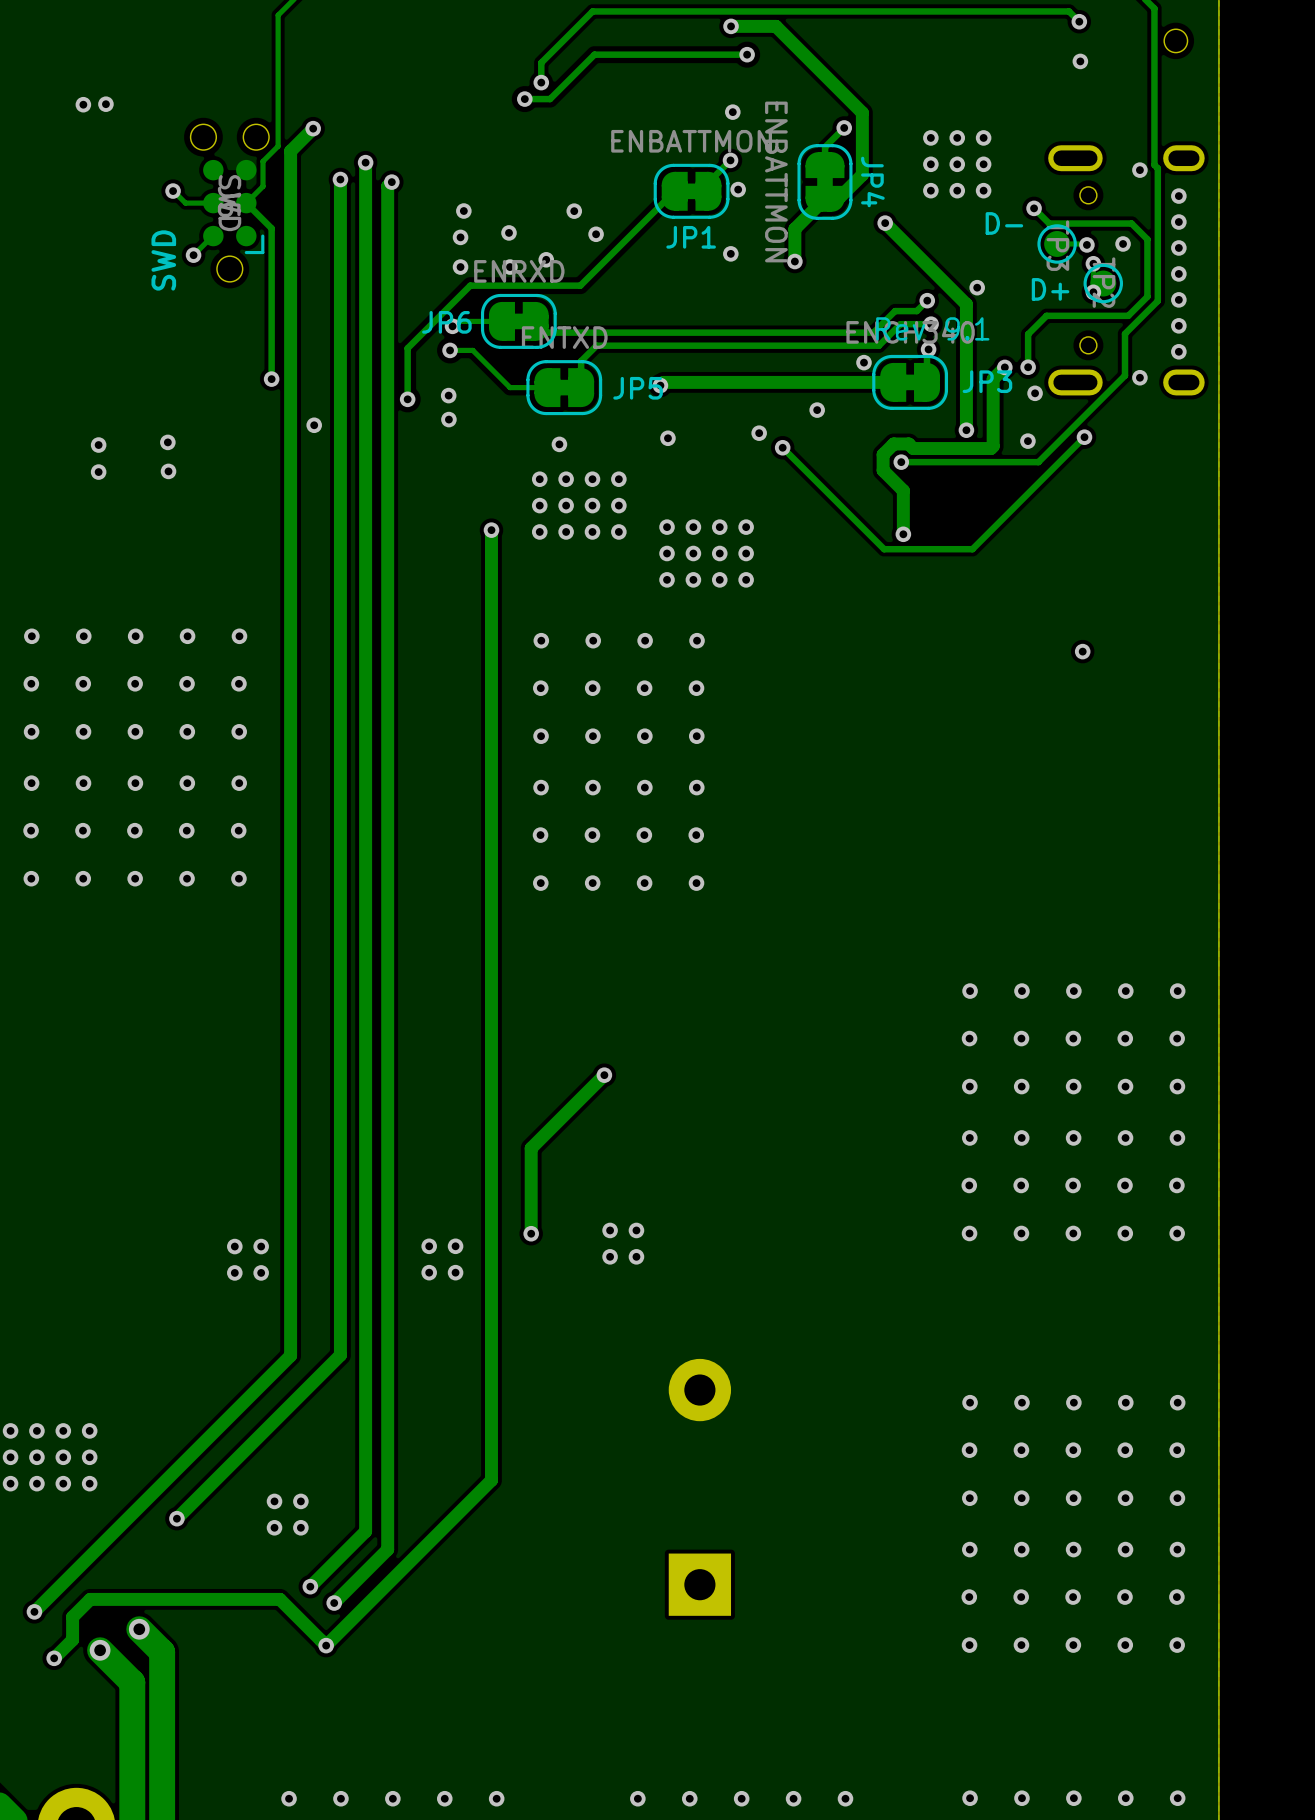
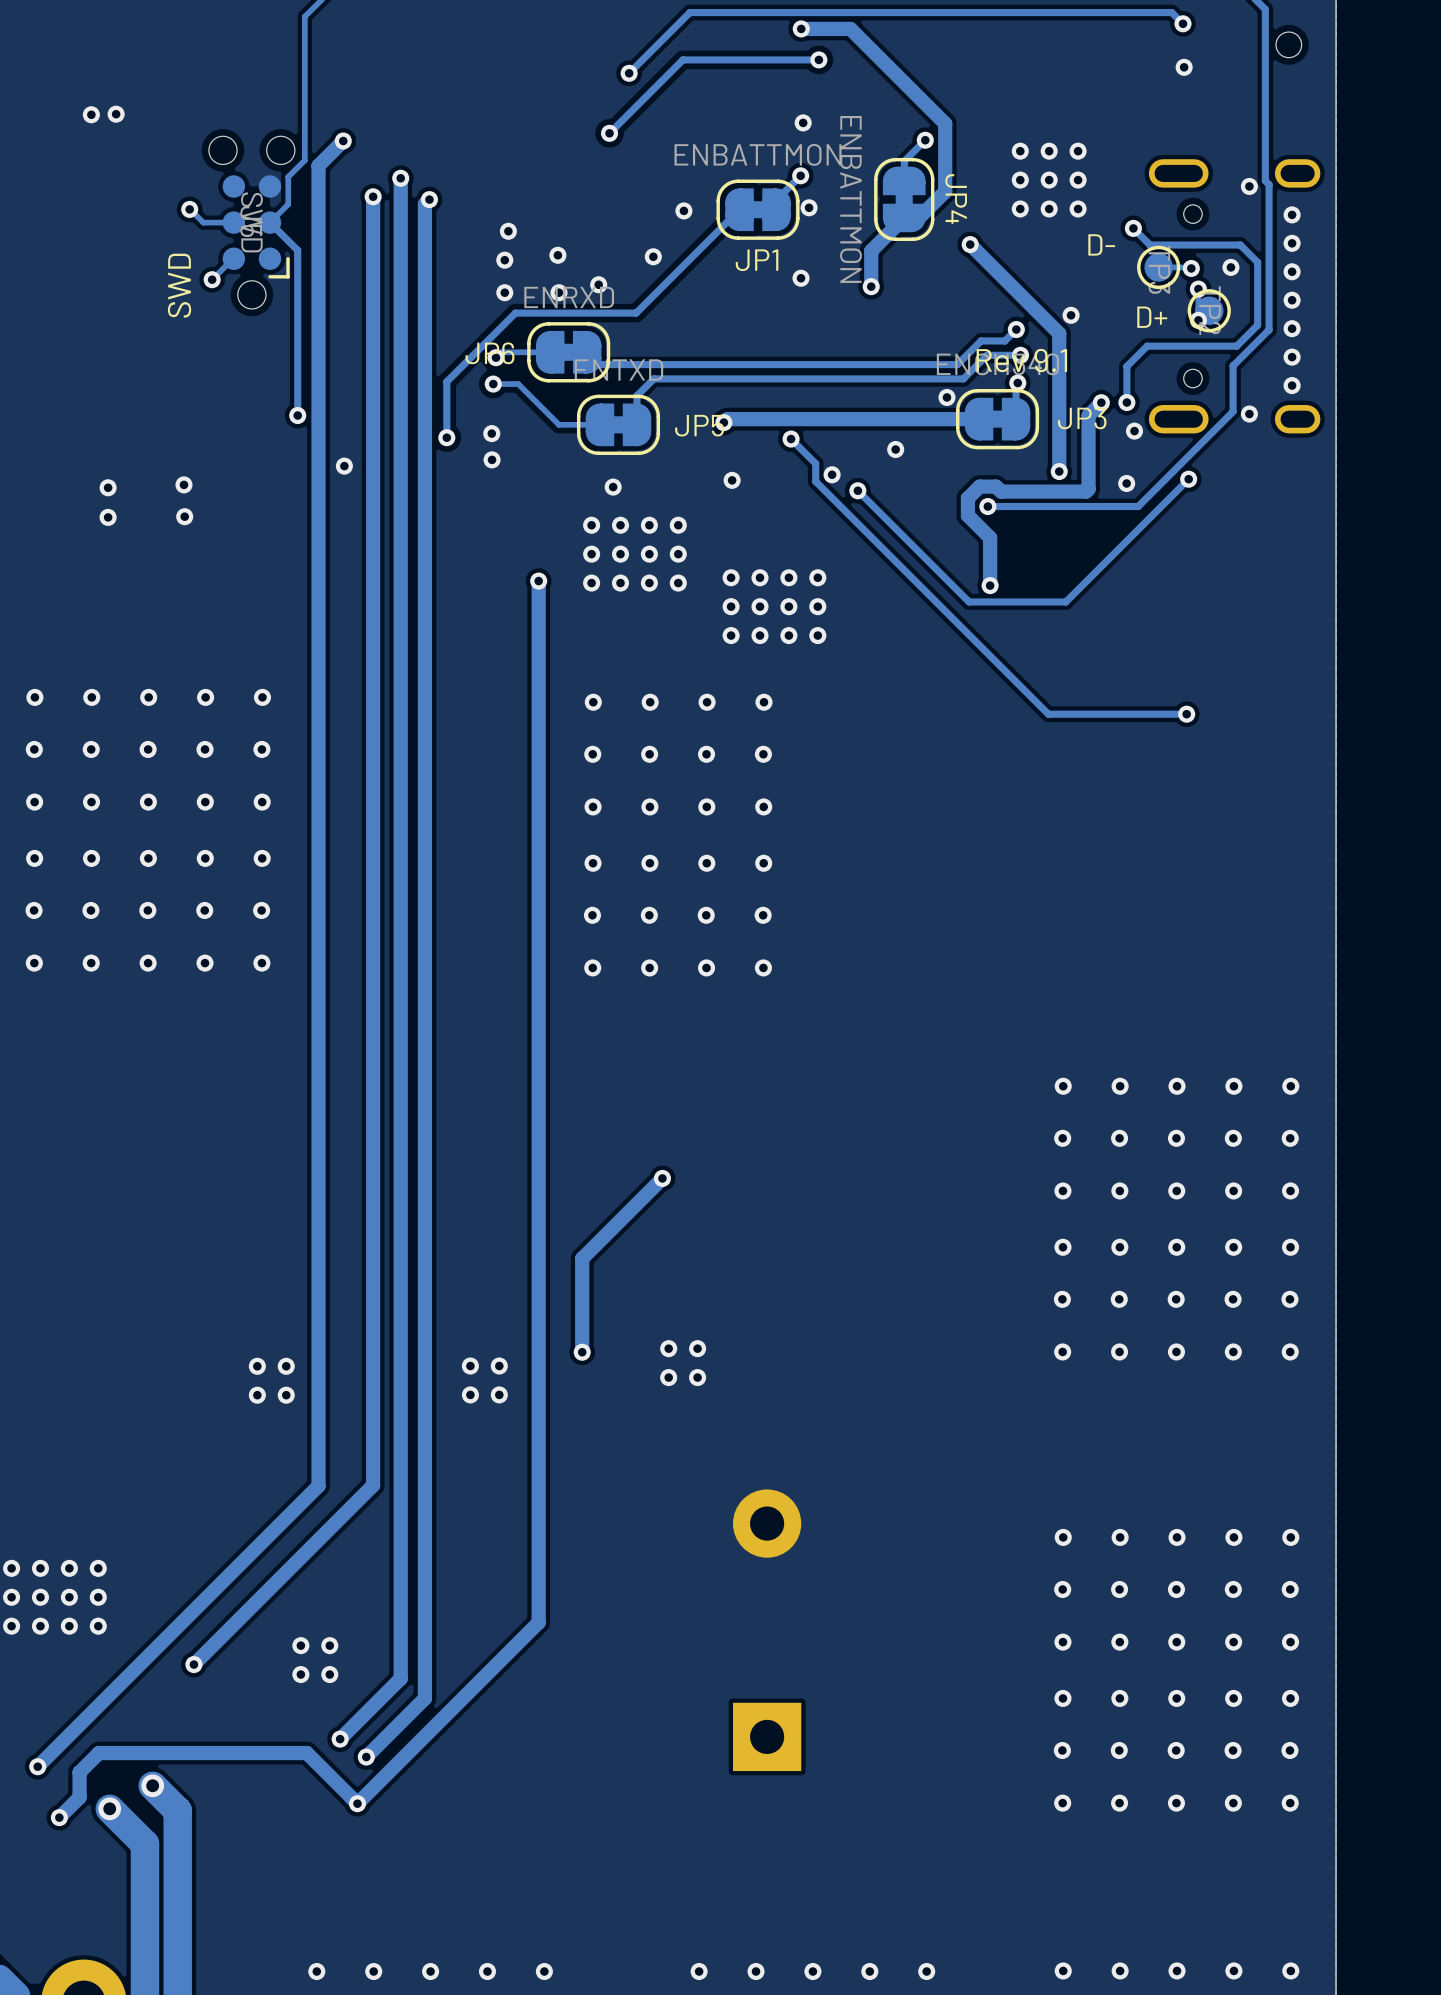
track: (629, 11) (592, 11) (541, 62) (541, 82) -> (689, 12) (629, 73)
track: (623, 54) (594, 54) (550, 99) (524, 99) -> (682, 59) (609, 133)
via: none -> (629, 73)
via: (541, 82) -> none
via: (524, 99) -> none
via: none -> (609, 133)
via: none -> (683, 210)
via: (574, 211) -> none
track: none -> (791, 439) (815, 463) (815, 481) (1048, 714) (1186, 714)
via: none -> (791, 439)

